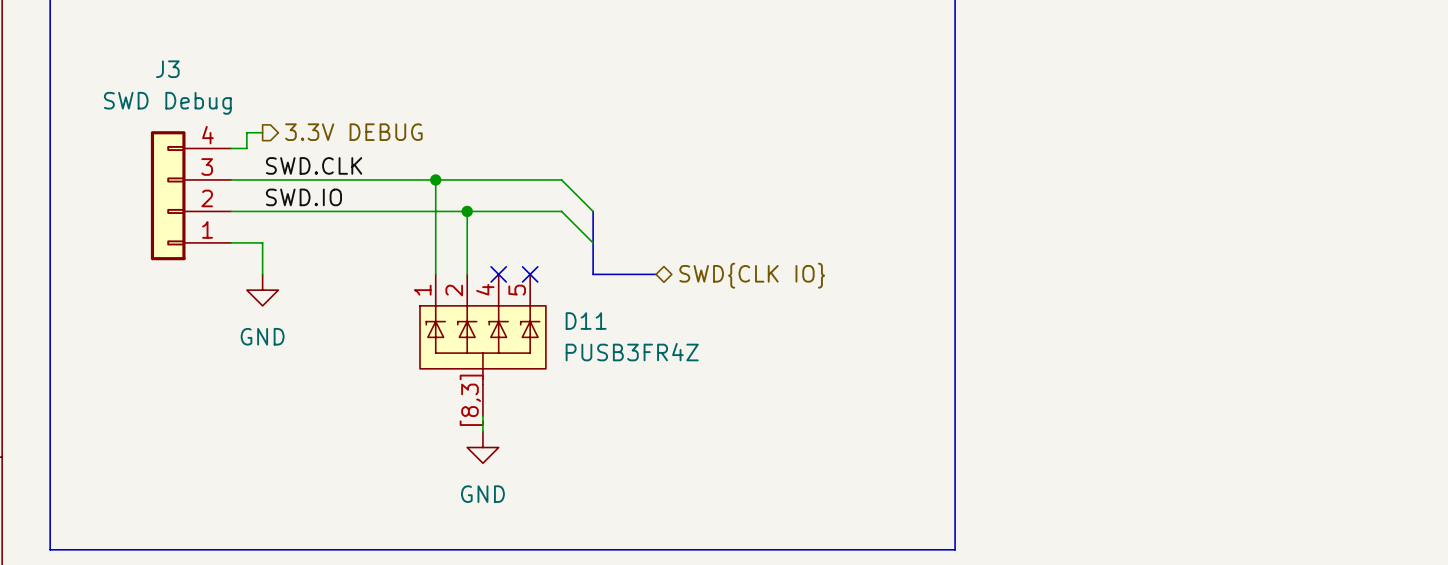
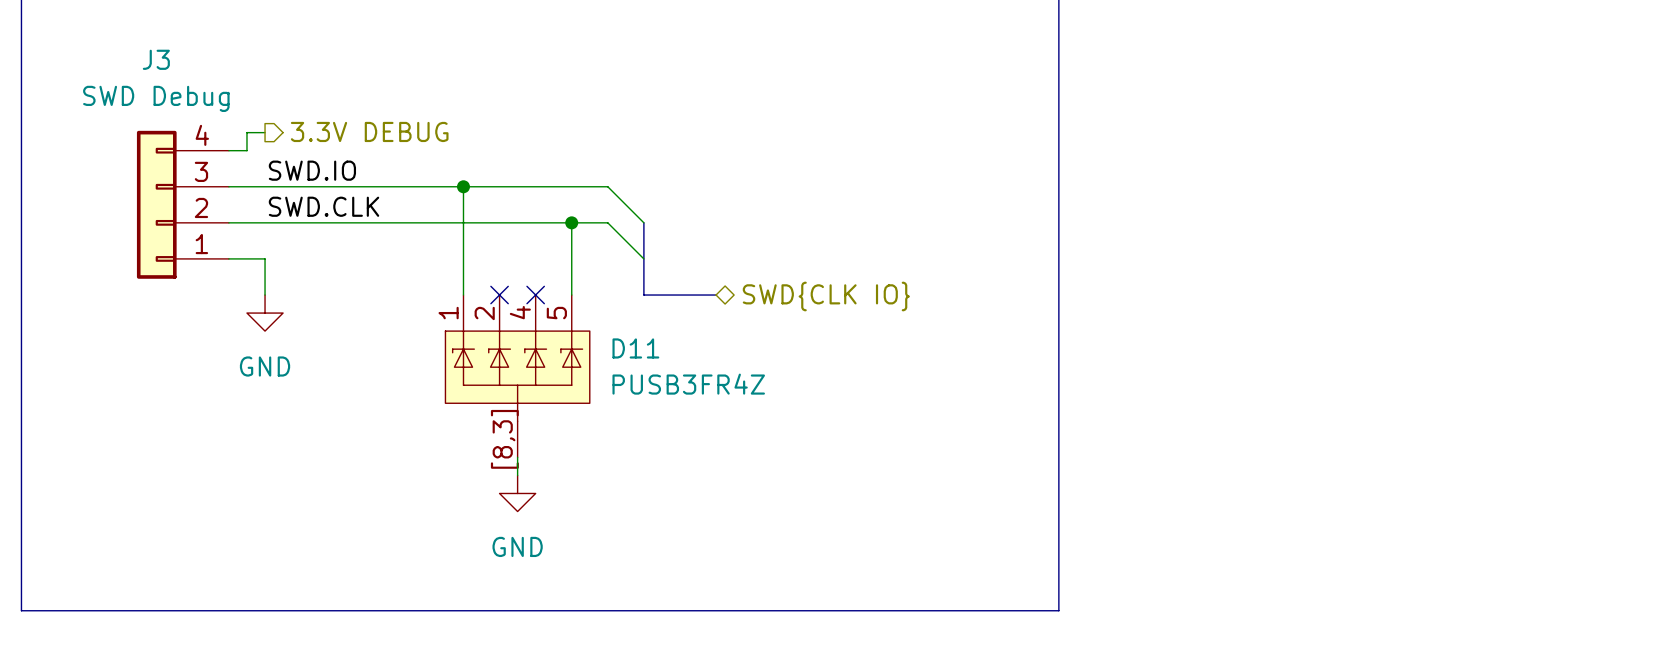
label: SWD.CLK (314, 165) -> SWD.IO (312, 170)
label: SWD.IO (303, 197) -> SWD.CLK (324, 206)
wire: (467, 211) (467, 274) -> (571, 222) (571, 295)
junction position: (467, 211) -> (571, 222)
no-connect mark position: (530, 274) -> (499, 295)

